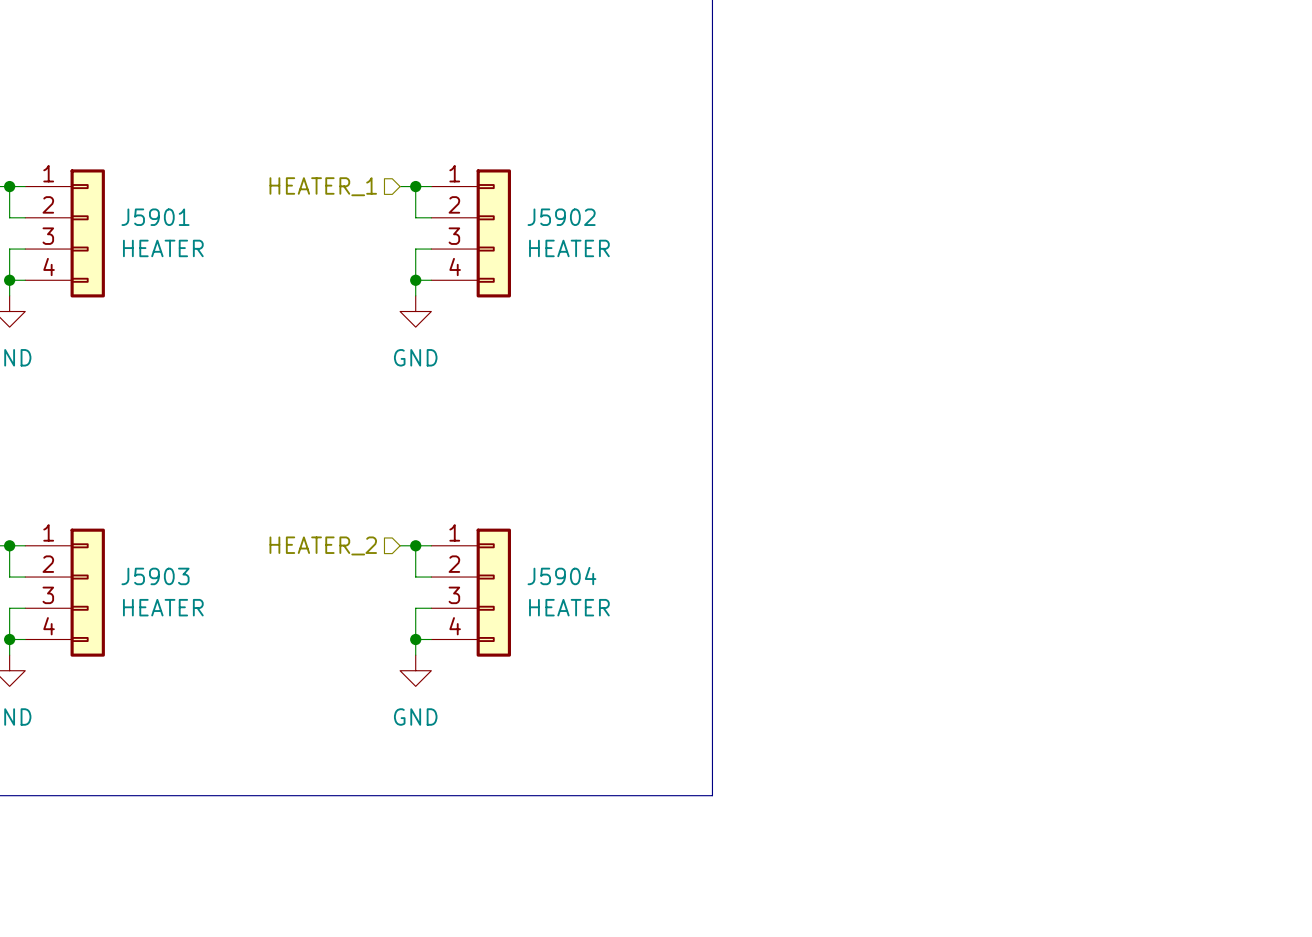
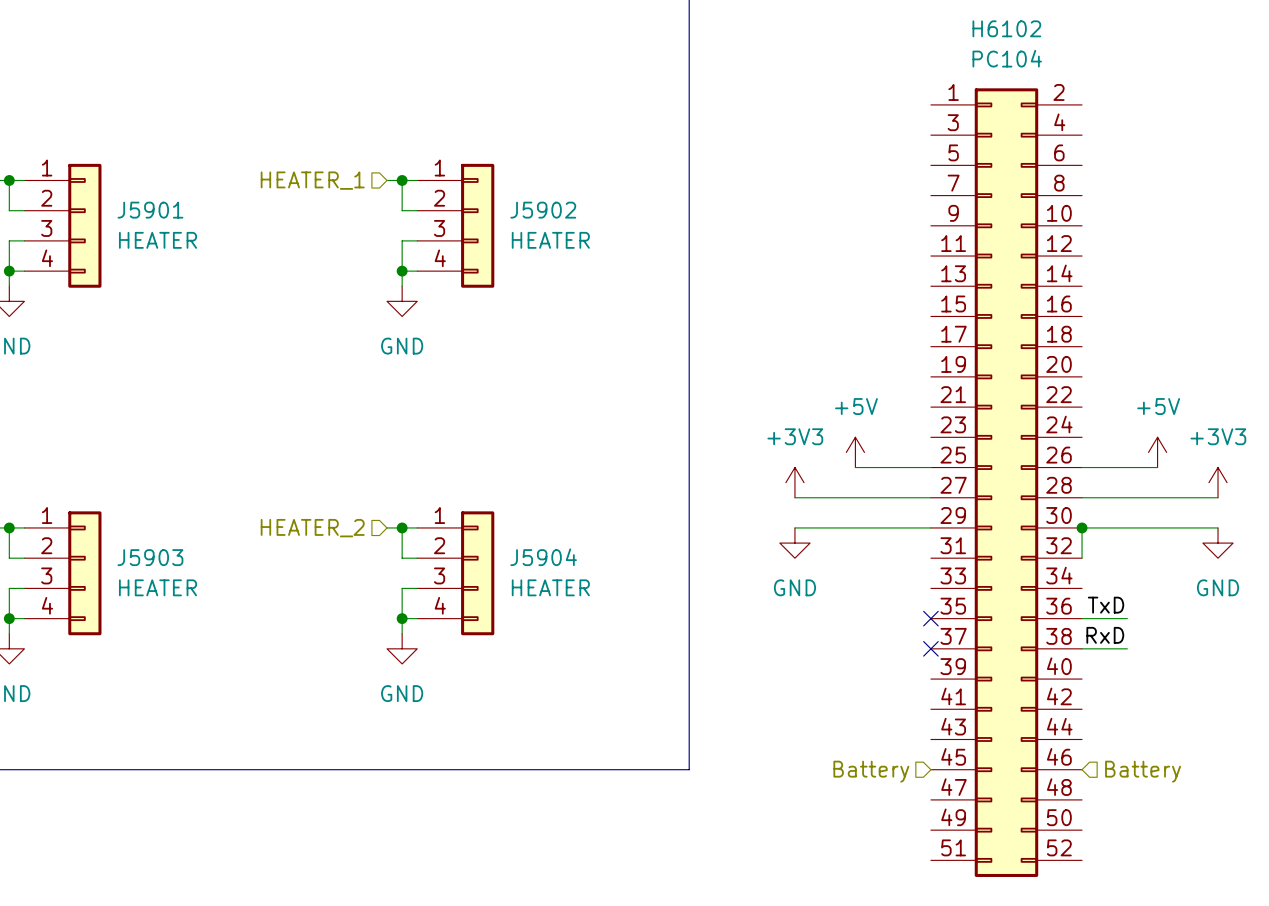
power symbol: none -> +5V (855, 452)
power symbol: none -> +5V (1157, 452)
wire: none -> (855, 467) (930, 467)
wire: none -> (1082, 467) (1157, 467)
power symbol: none -> +3V3 (794, 482)
H6102: none -> PC104 (1006, 482)
power symbol: none -> +3V3 (1218, 482)
wire: none -> (794, 497) (930, 497)
wire: none -> (1082, 497) (1218, 497)
wire: none -> (794, 527) (930, 527)
junction: none -> (1082, 527)
wire: none -> (1218, 527) (1082, 527) (1082, 558)
power symbol: none -> GND (794, 543)
power symbol: none -> GND (1218, 543)
label: none -> TxD (1106, 605)
no-connect mark: none -> (930, 618)
wire: none -> (1082, 618) (1127, 618)
label: none -> RxD (1105, 635)
no-connect mark: none -> (930, 648)
wire: none -> (1082, 648) (1127, 648)
hierarchical label: none -> Battery (871, 771)
hierarchical label: none -> Battery (1143, 771)

